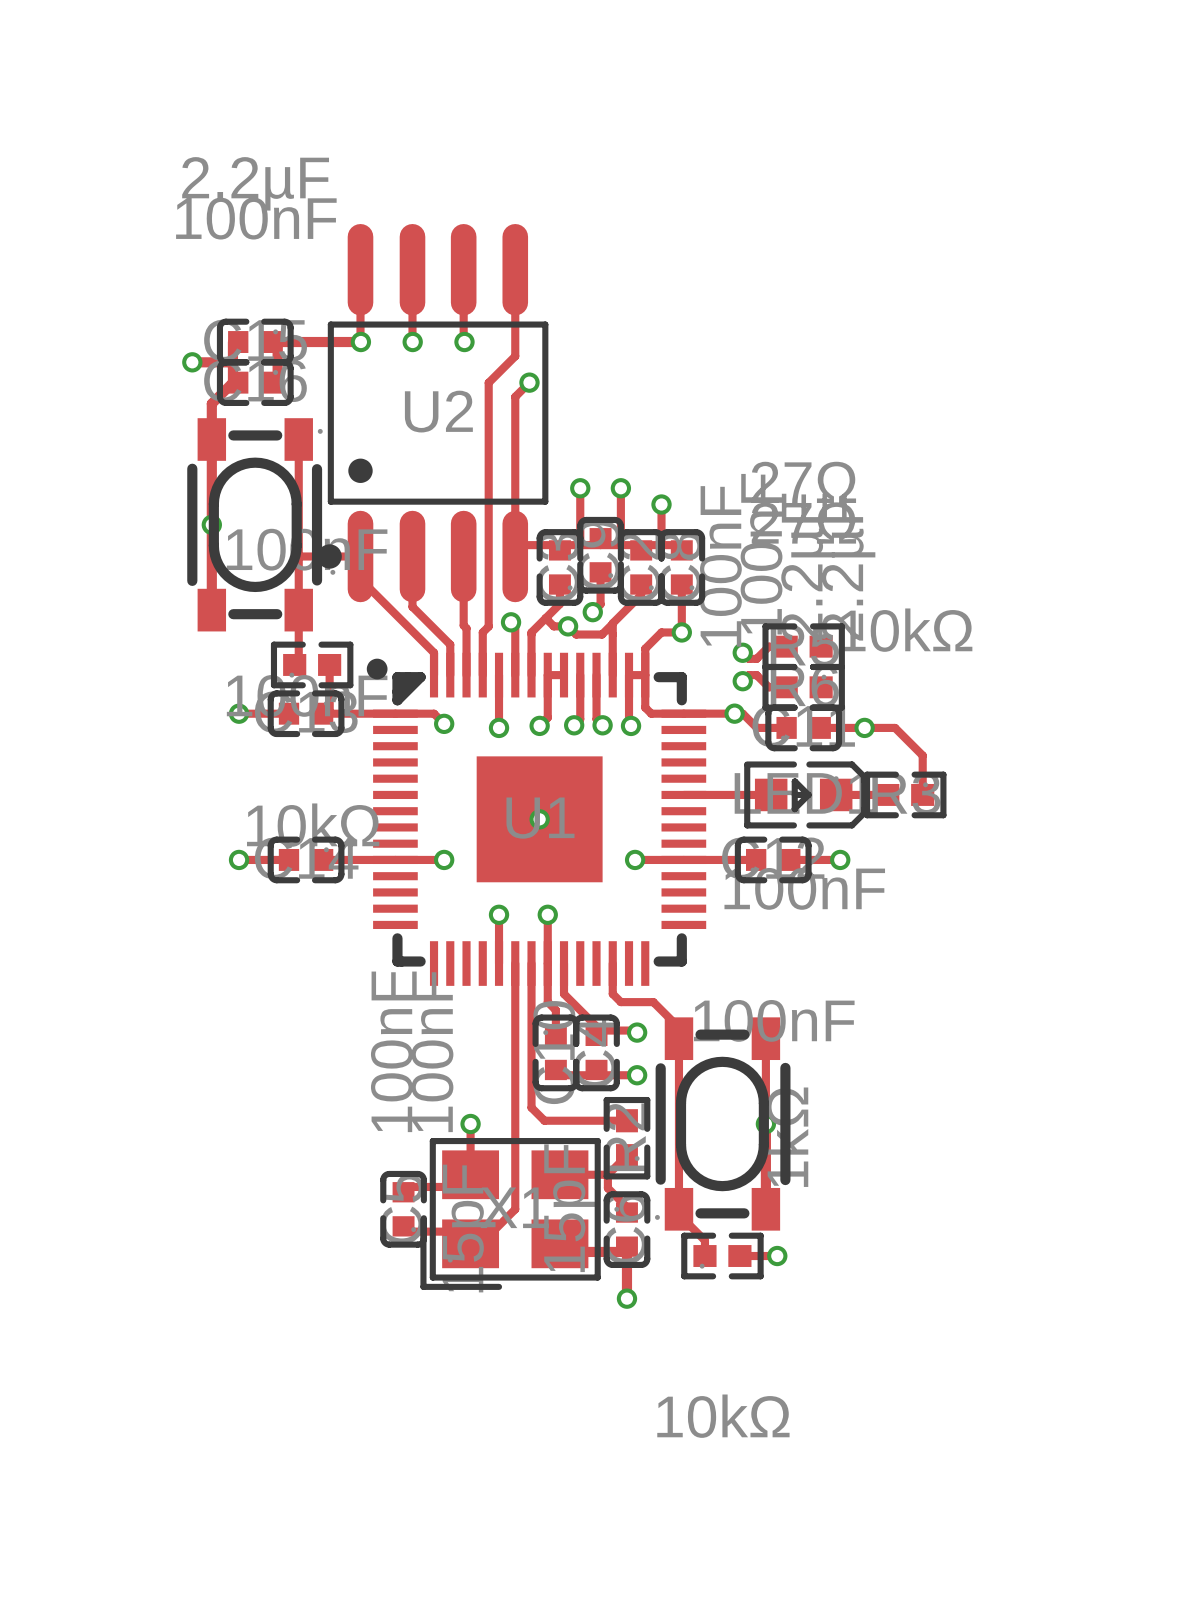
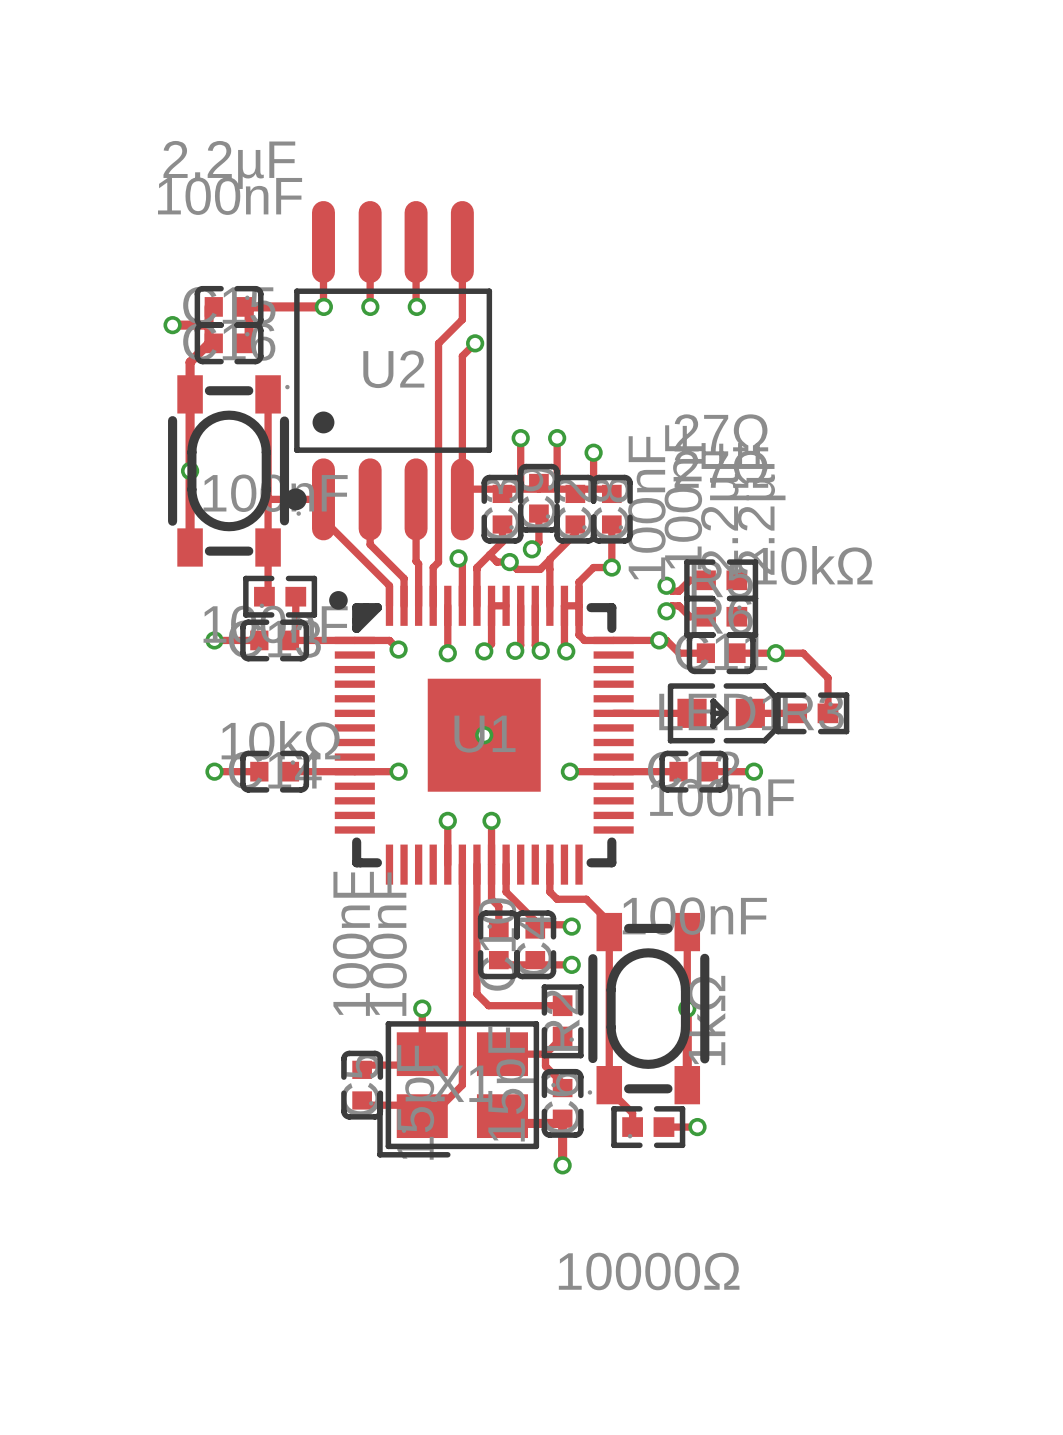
part value: 10kΩ (723, 1416) -> 10000Ω (649, 1271)

